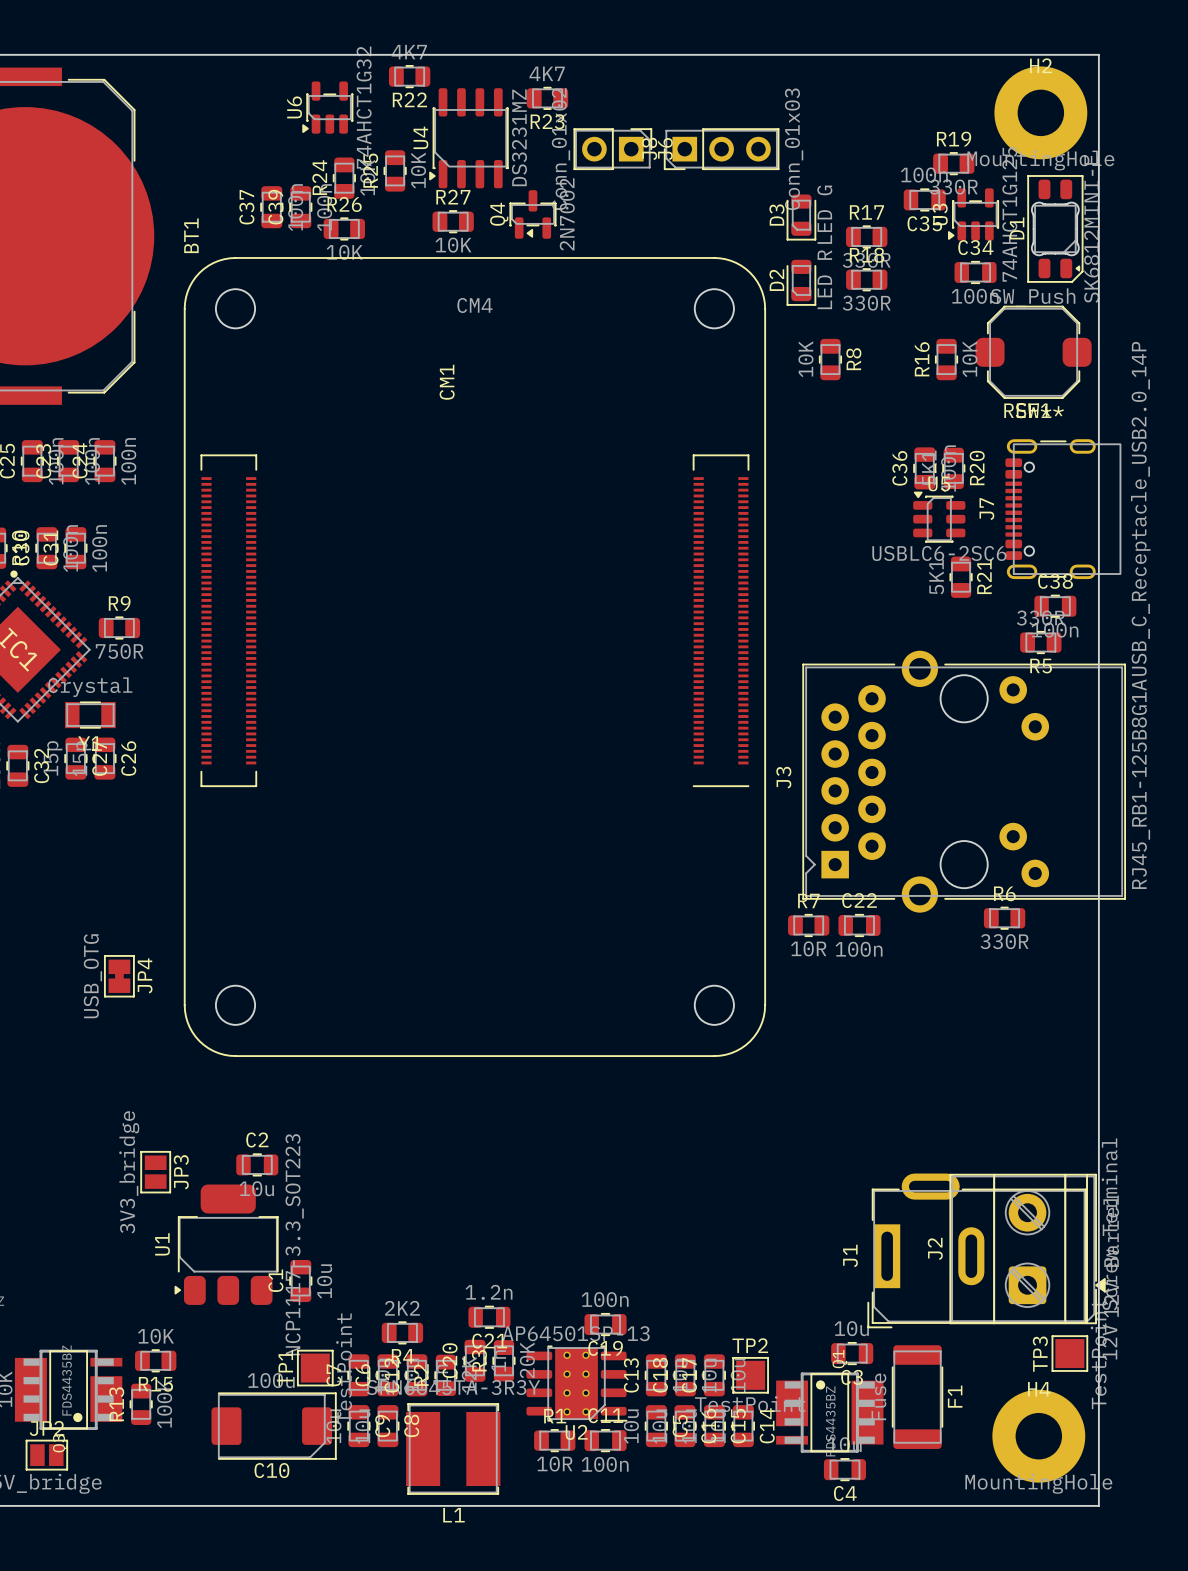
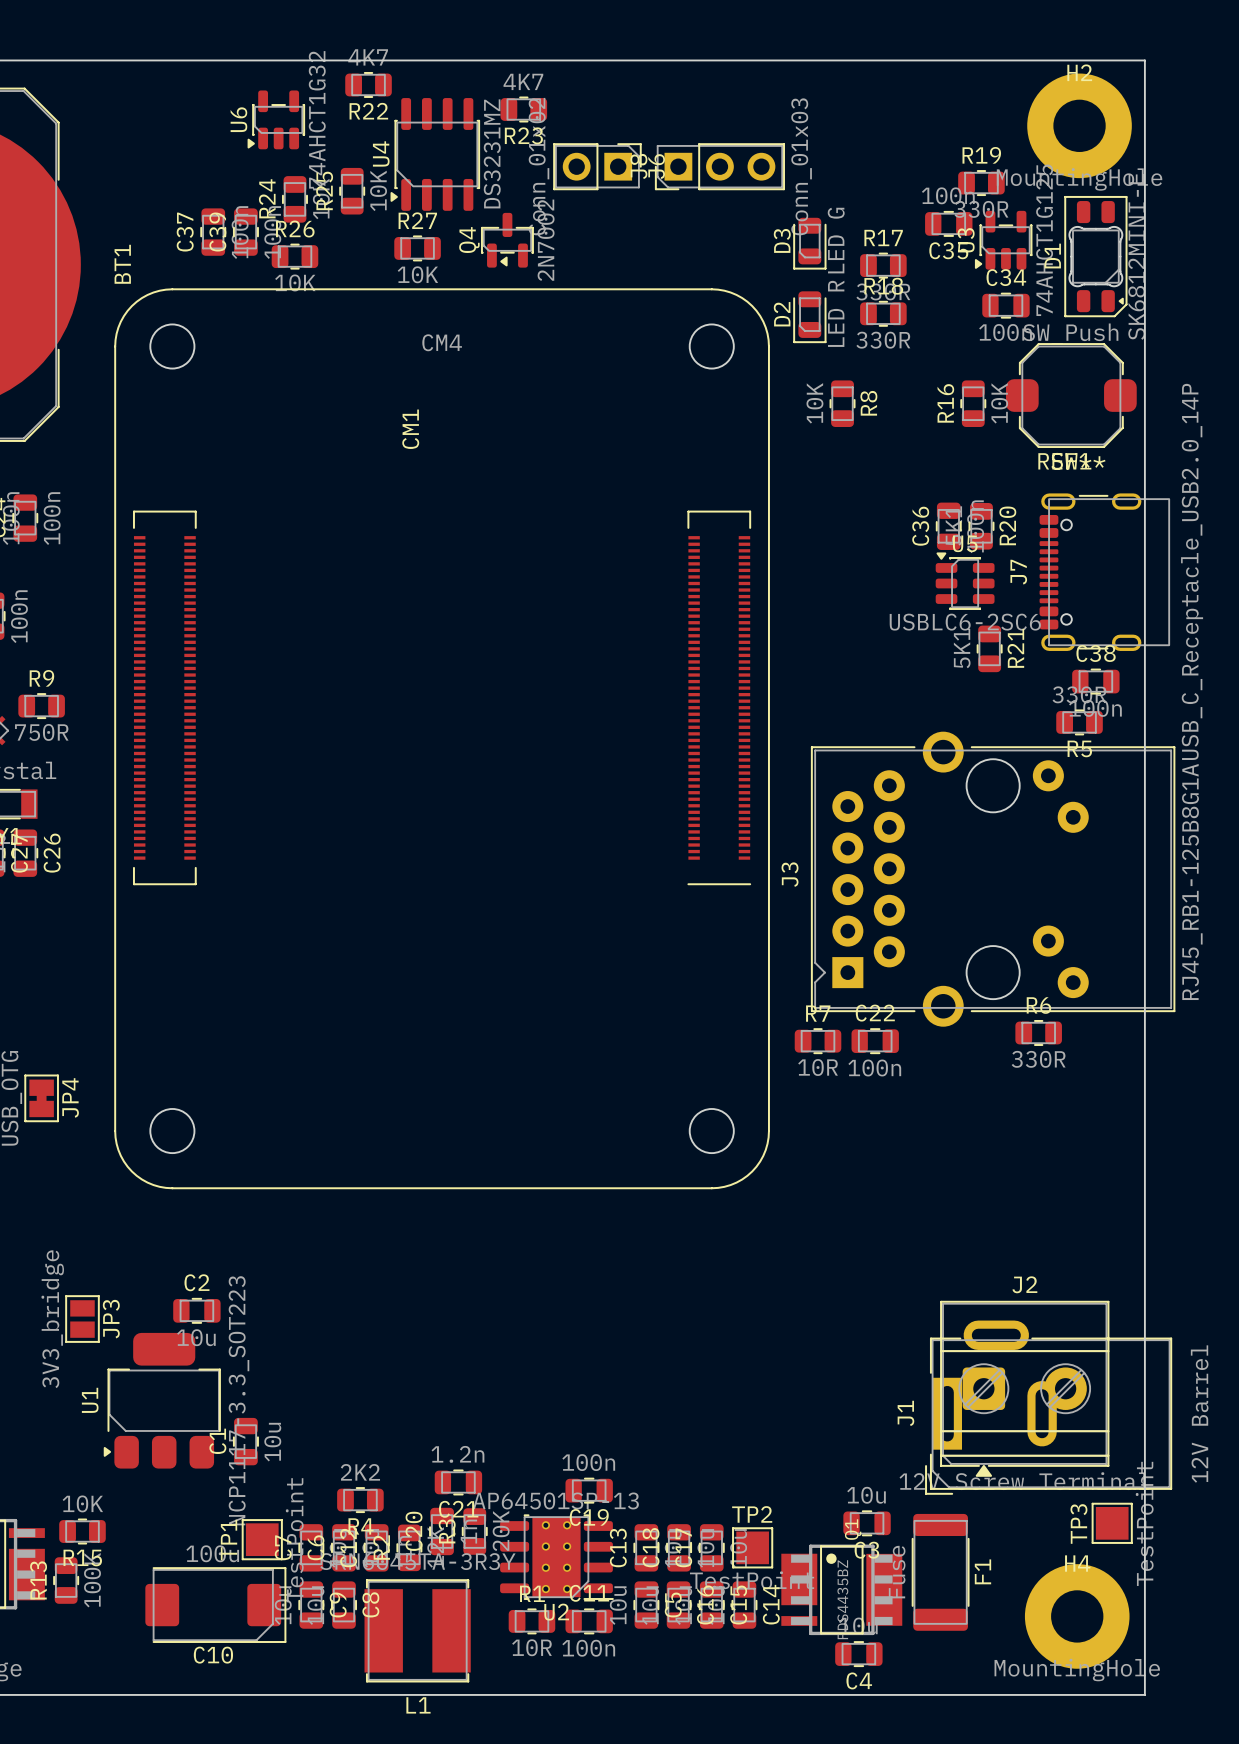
J2 rotation: 0° (1027, 1248) -> 90° clockwise (1024, 1388)
J1 position: (977, 1250) -> (1048, 1407)

